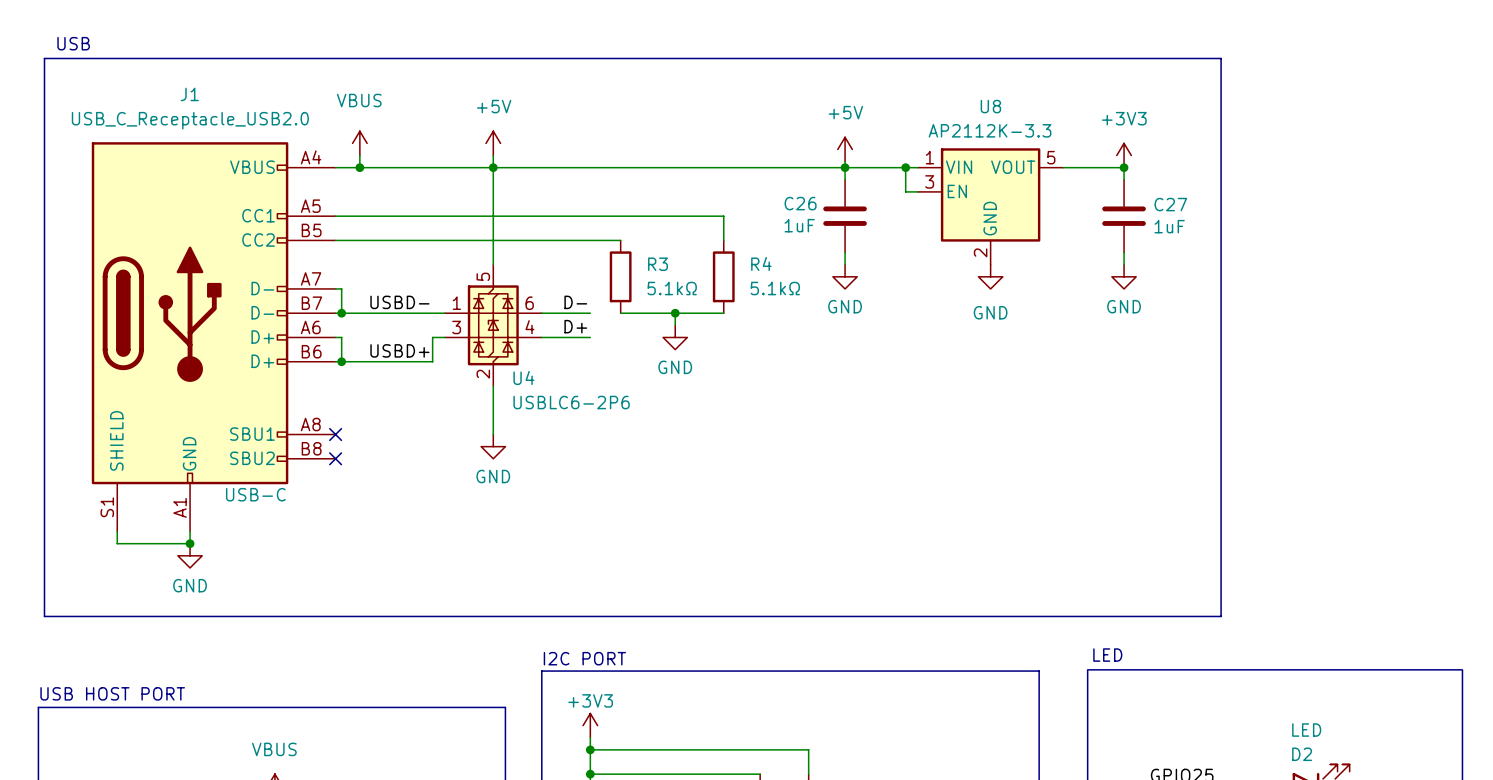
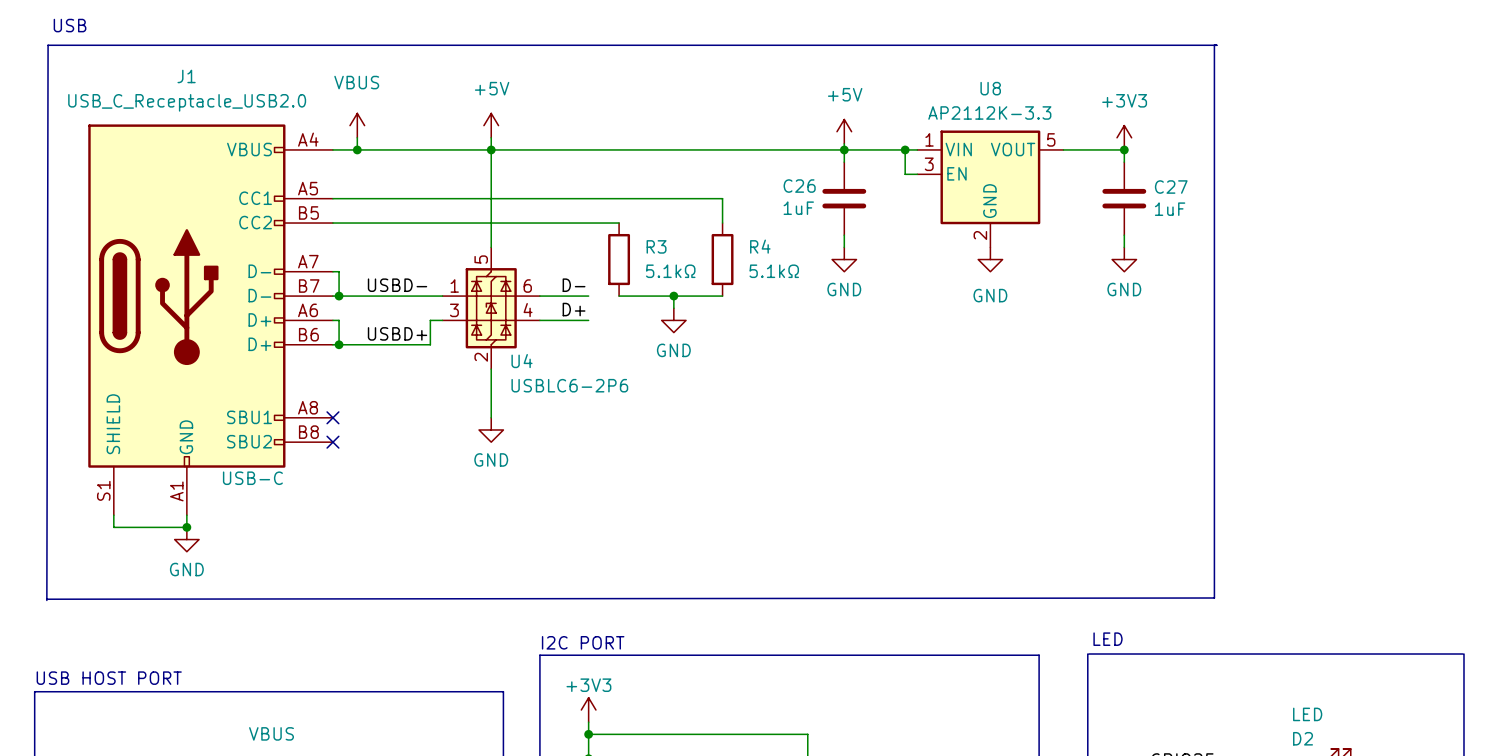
line: (44, 58) (44, 616) (1221, 616) (1221, 58) (44, 58) -> none
line: none -> (1214, 45) (1214, 598) (46, 599)
line: none -> (1216, 45) (48, 45) (46, 600)

